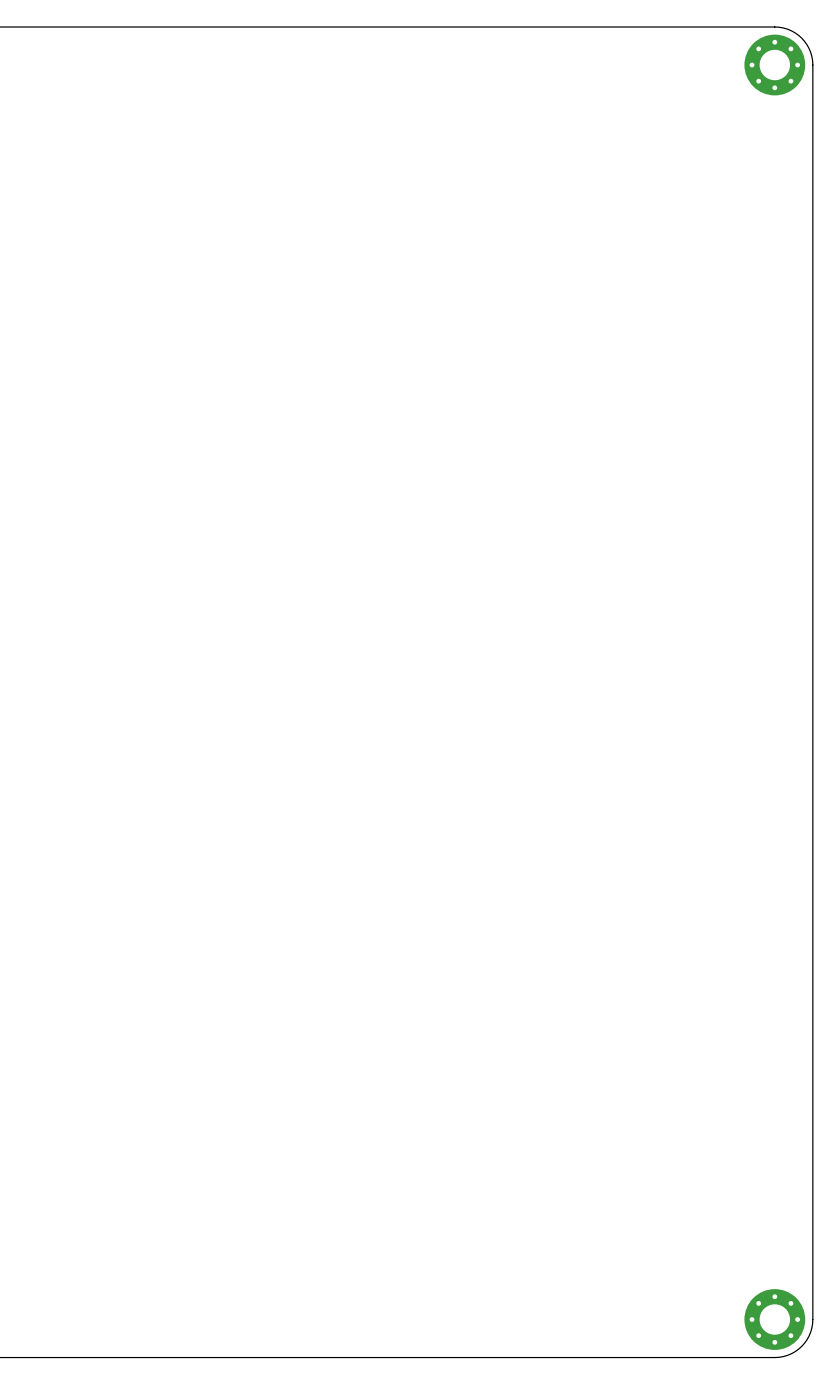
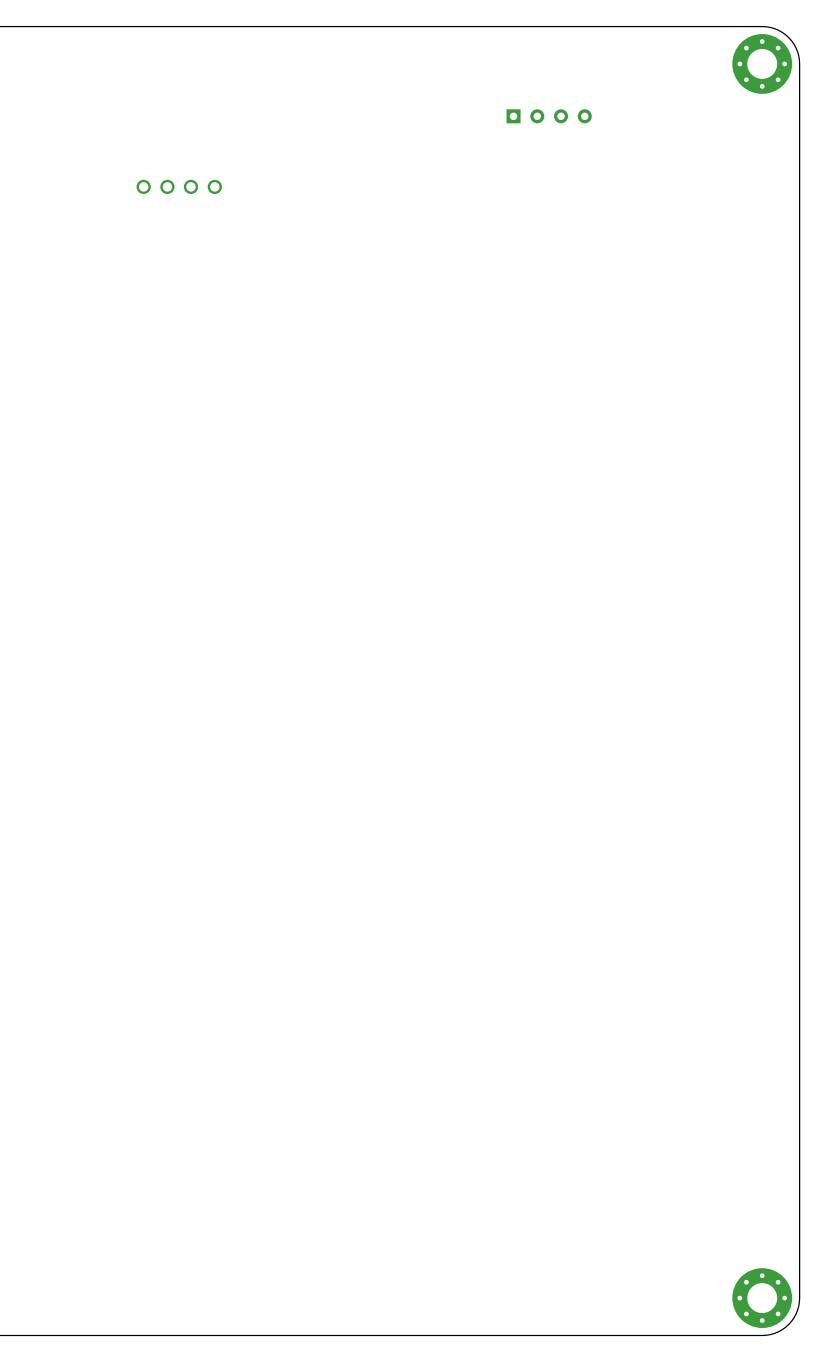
part: none -> (549, 116)
part: none -> (179, 186)

